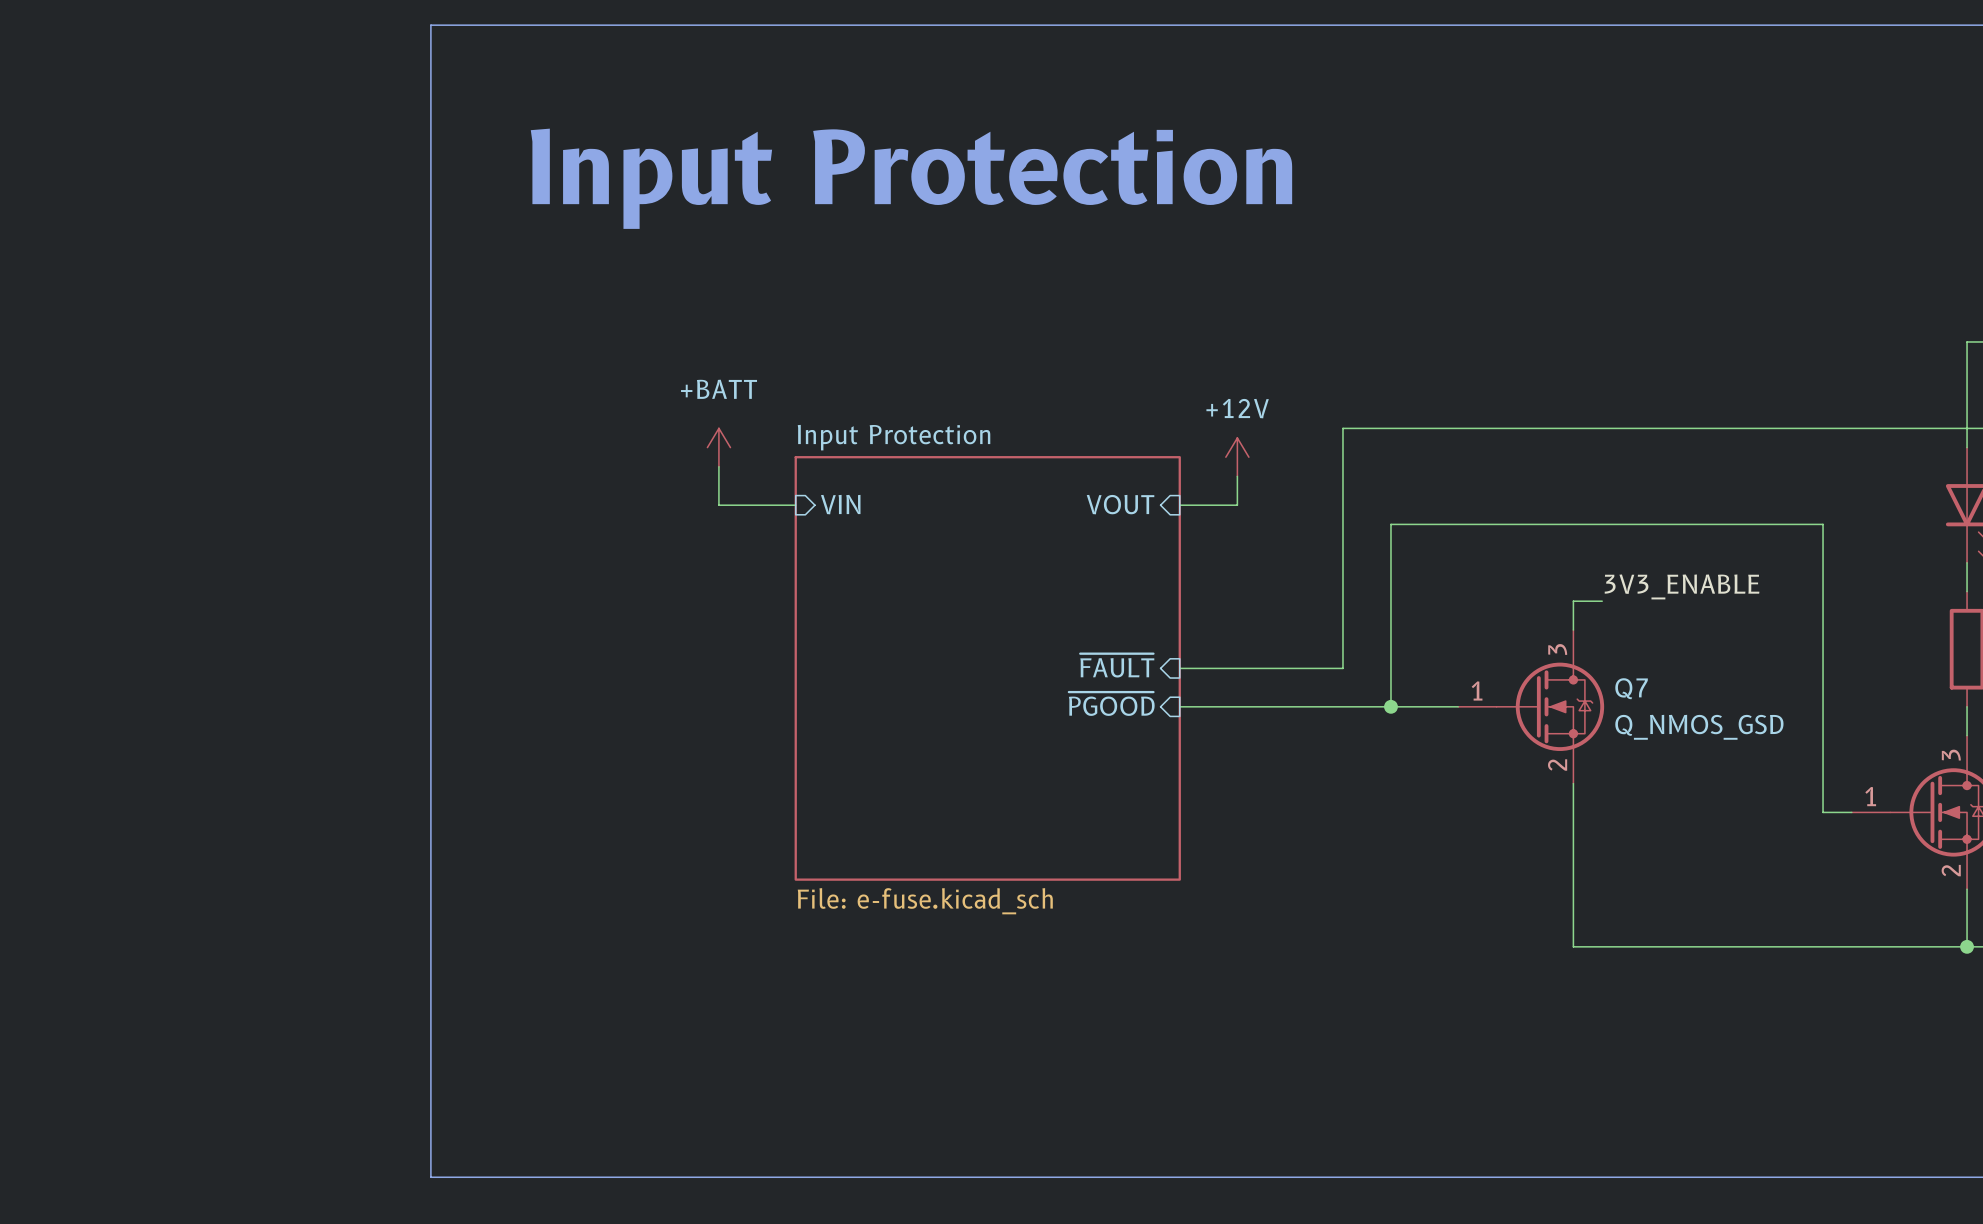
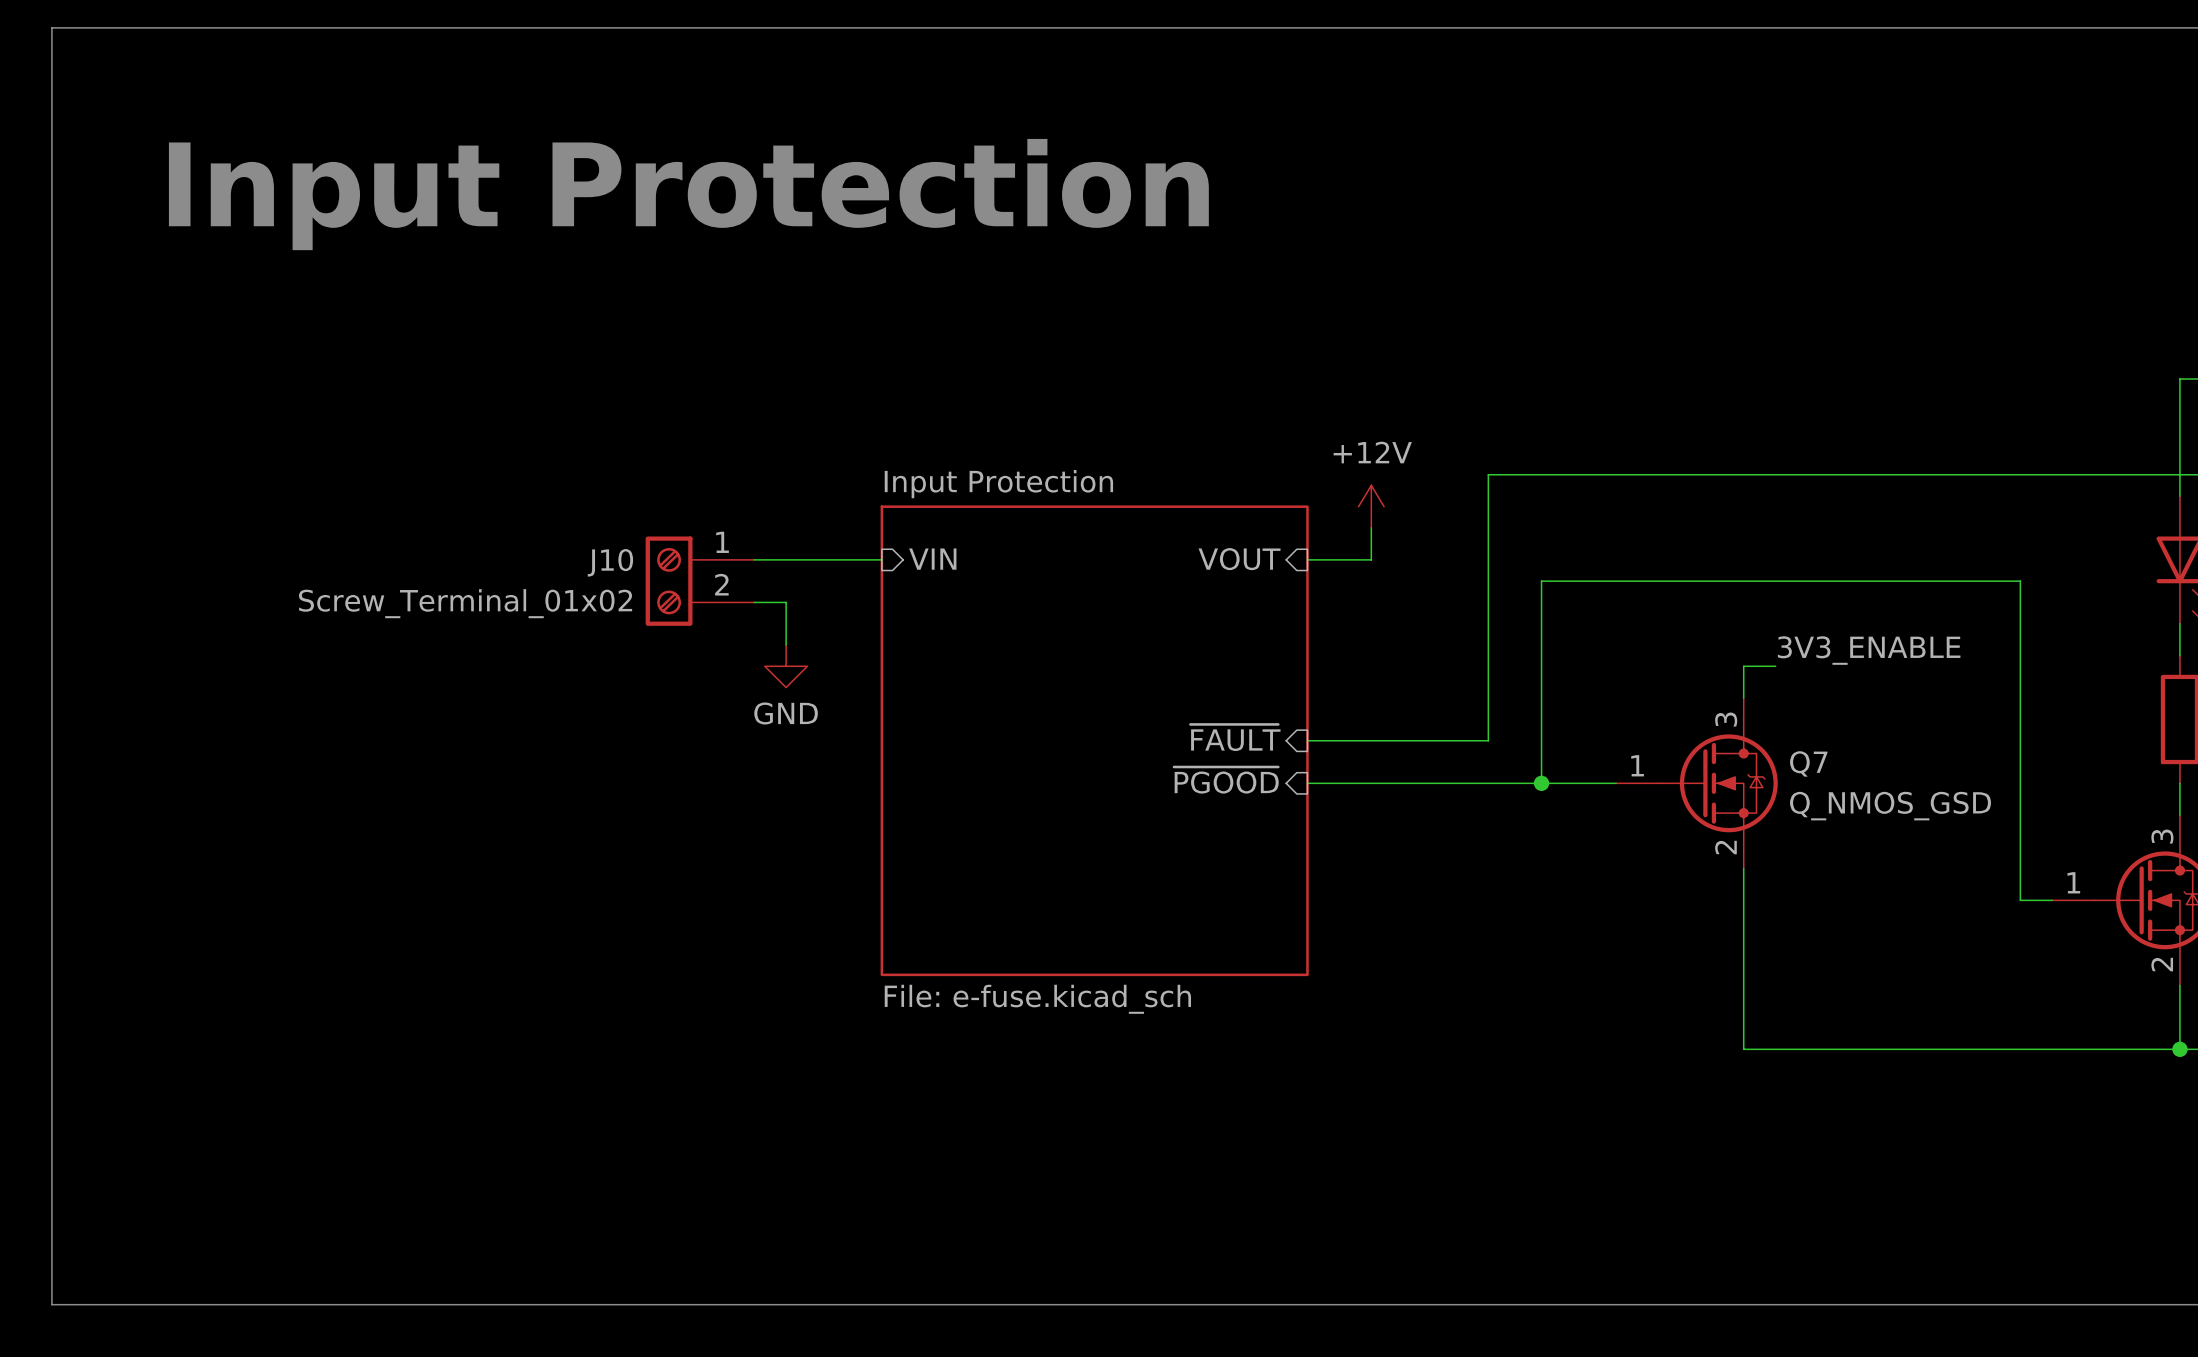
line: (430, 25) (430, 1177) -> (477, 27) (51, 27) (51, 1304) (477, 1304)
text: none -> Input Protection (688, 194)
text: Input Protection (911, 178) -> none
power symbol: +BATT (718, 447) -> none
wire: (718, 466) (718, 505) -> (754, 559) (796, 559)
J10: none -> Screw_Terminal_01x02 (699, 581)
wire: none -> (754, 602) (786, 602) (786, 645)
power symbol: none -> GND (786, 666)

